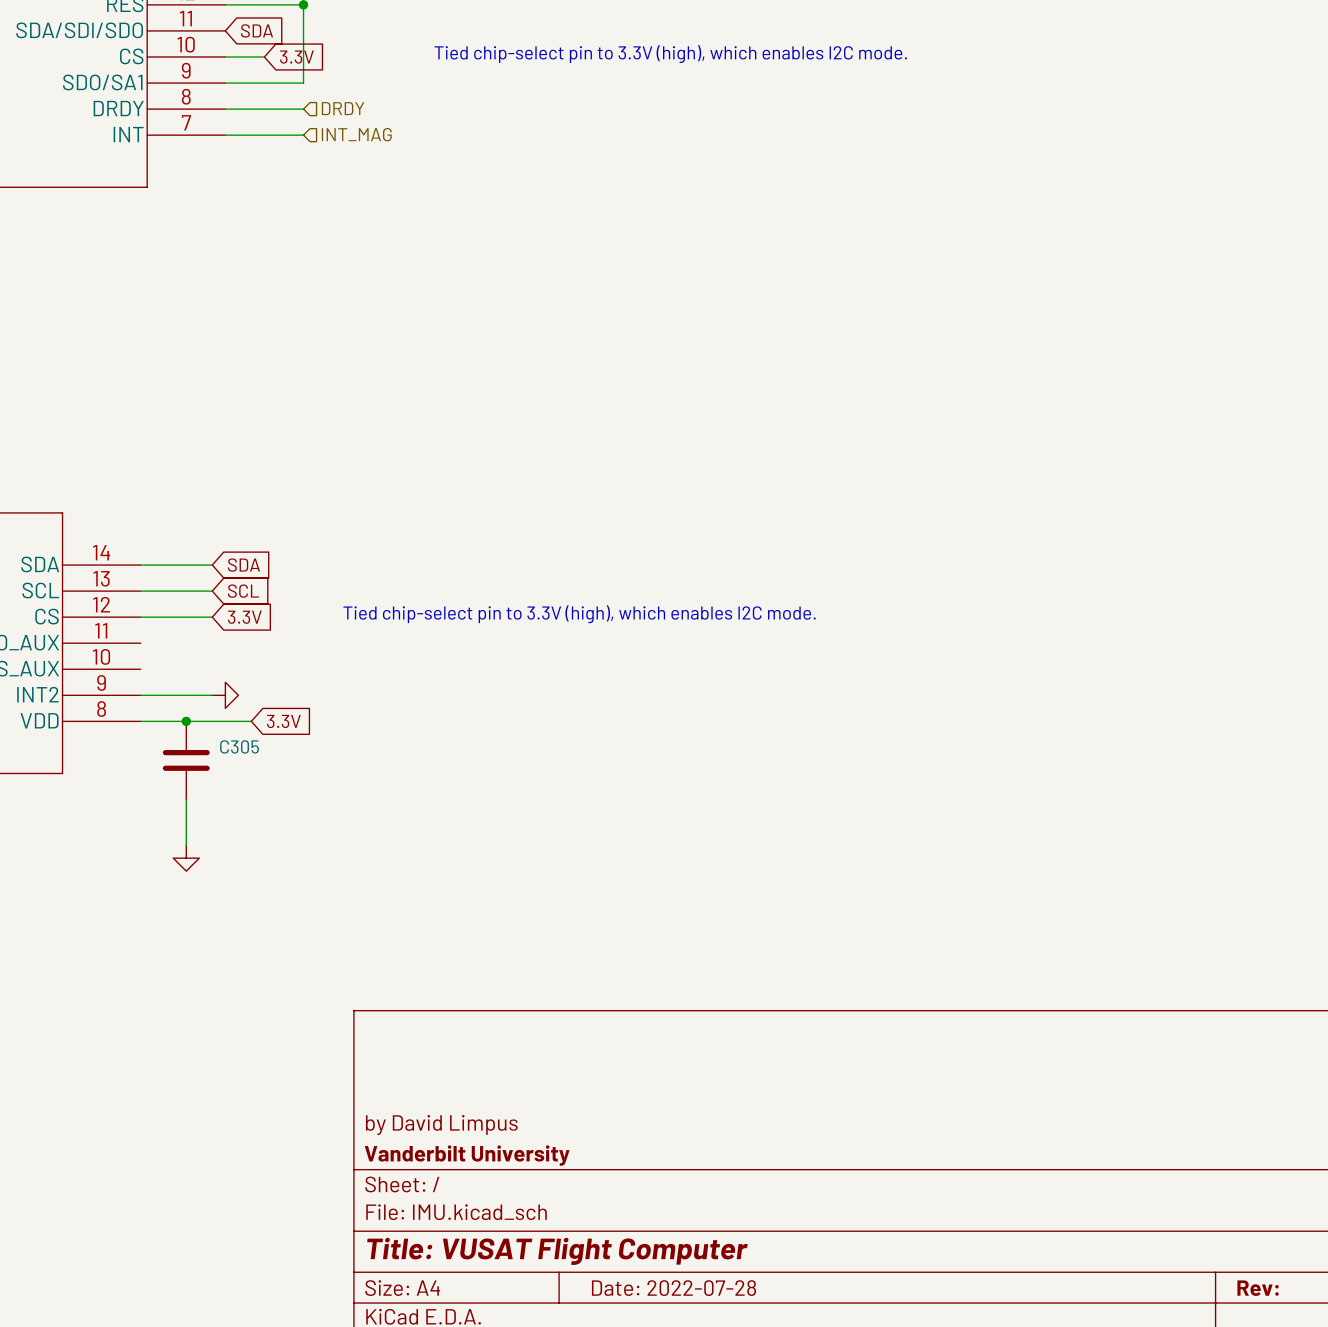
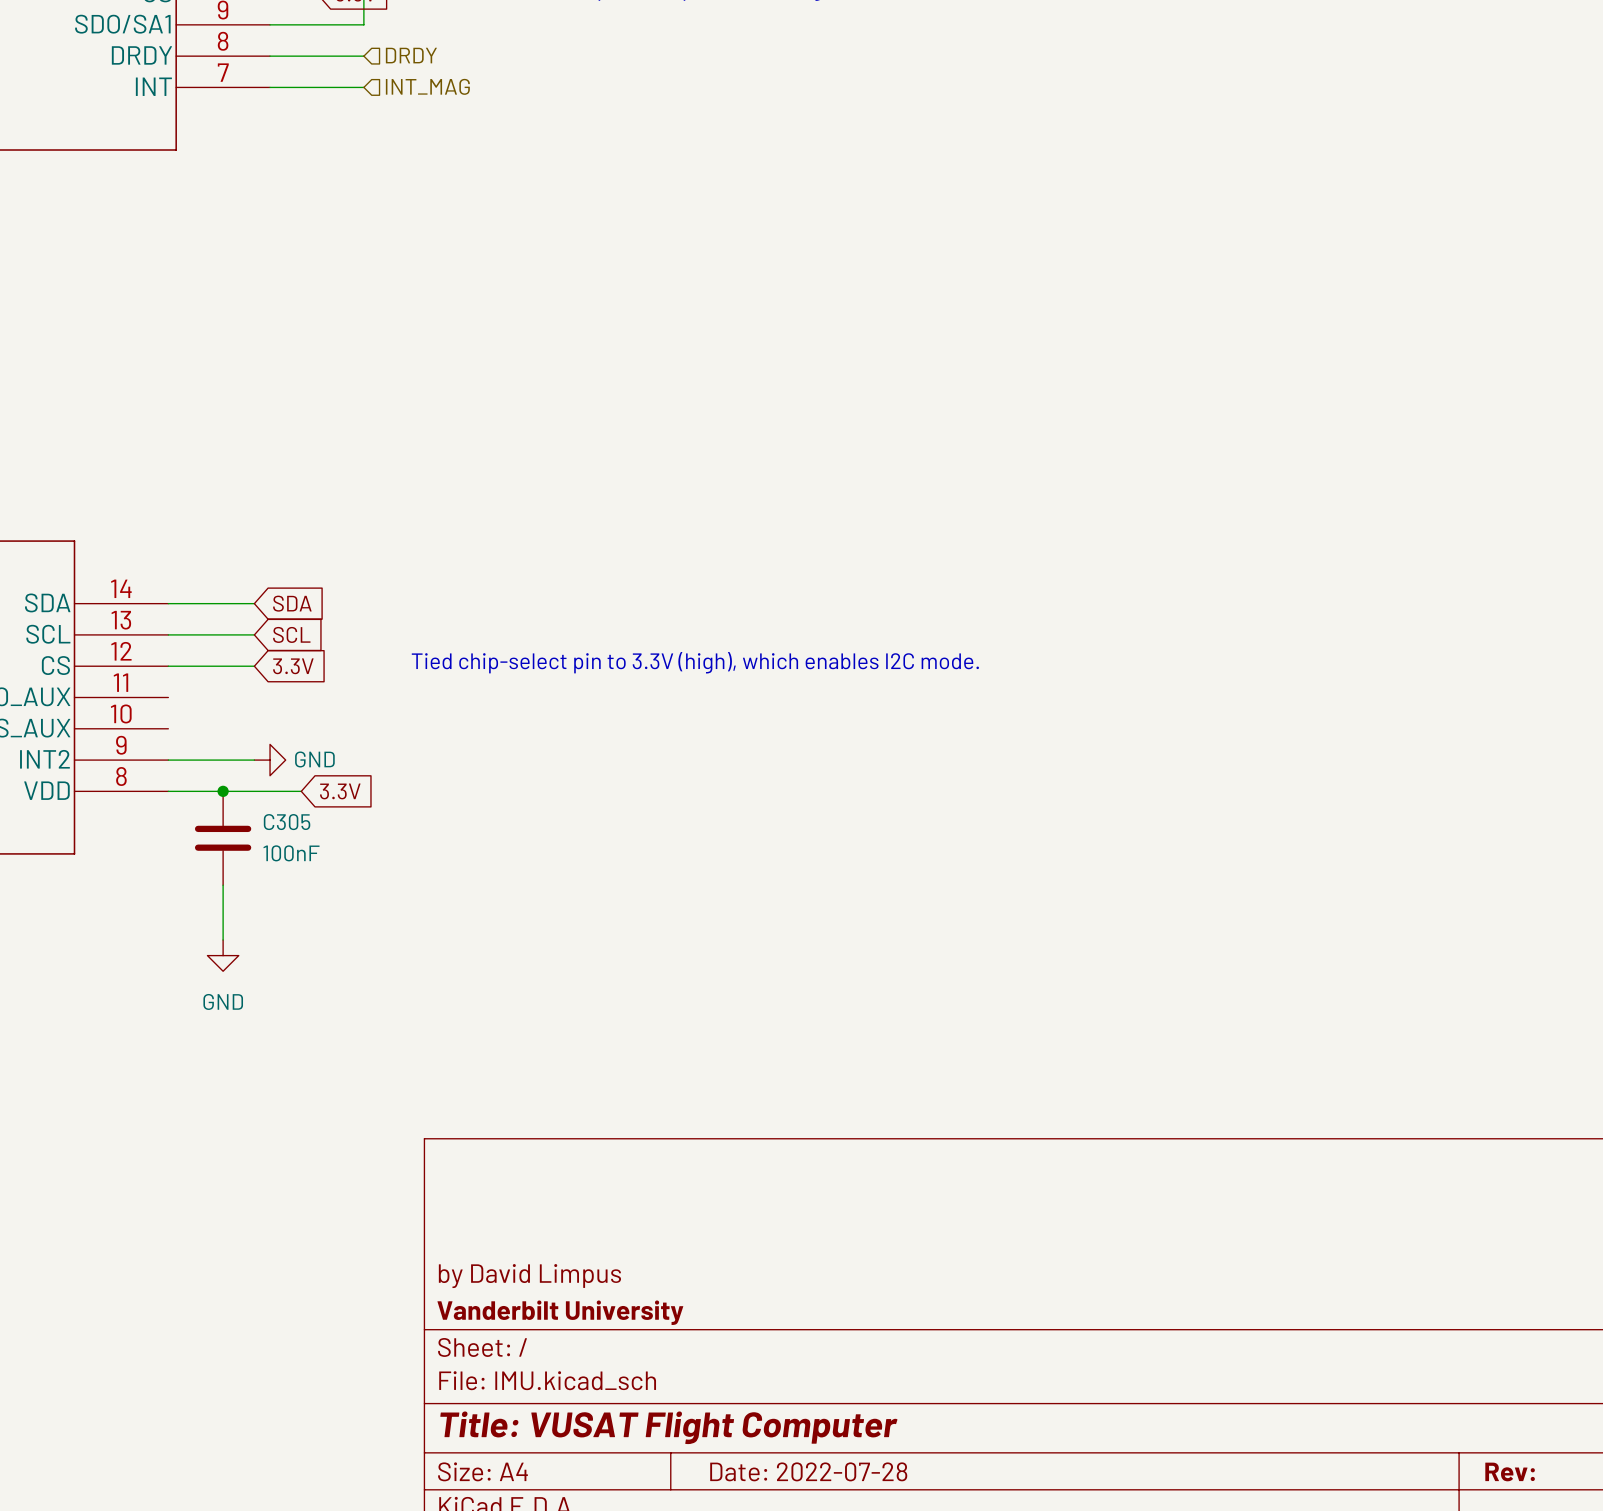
power symbol text: none -> GND (314, 759)
C305 value: none -> 100nF (291, 853)
power symbol text: none -> GND (223, 1001)

